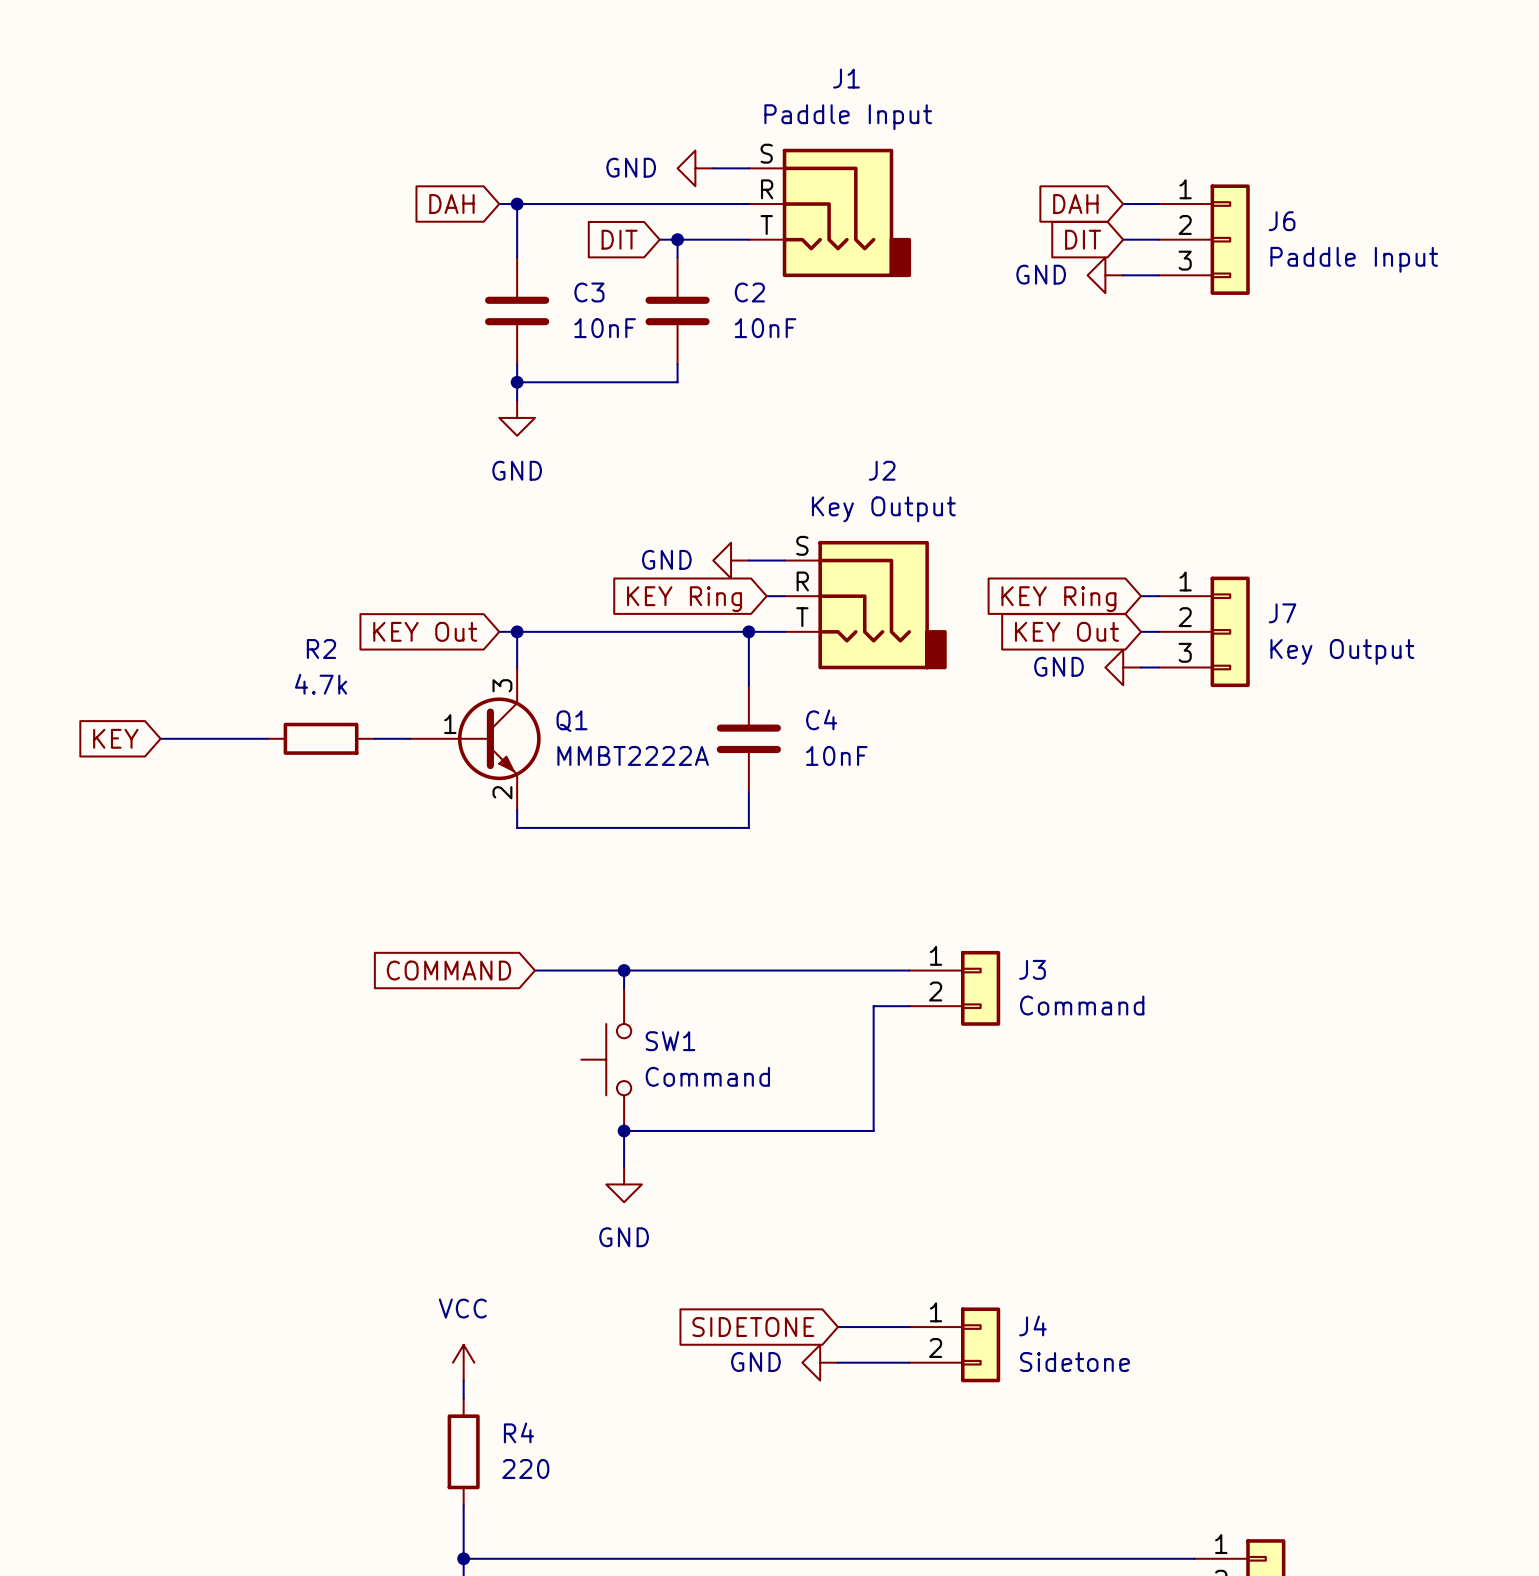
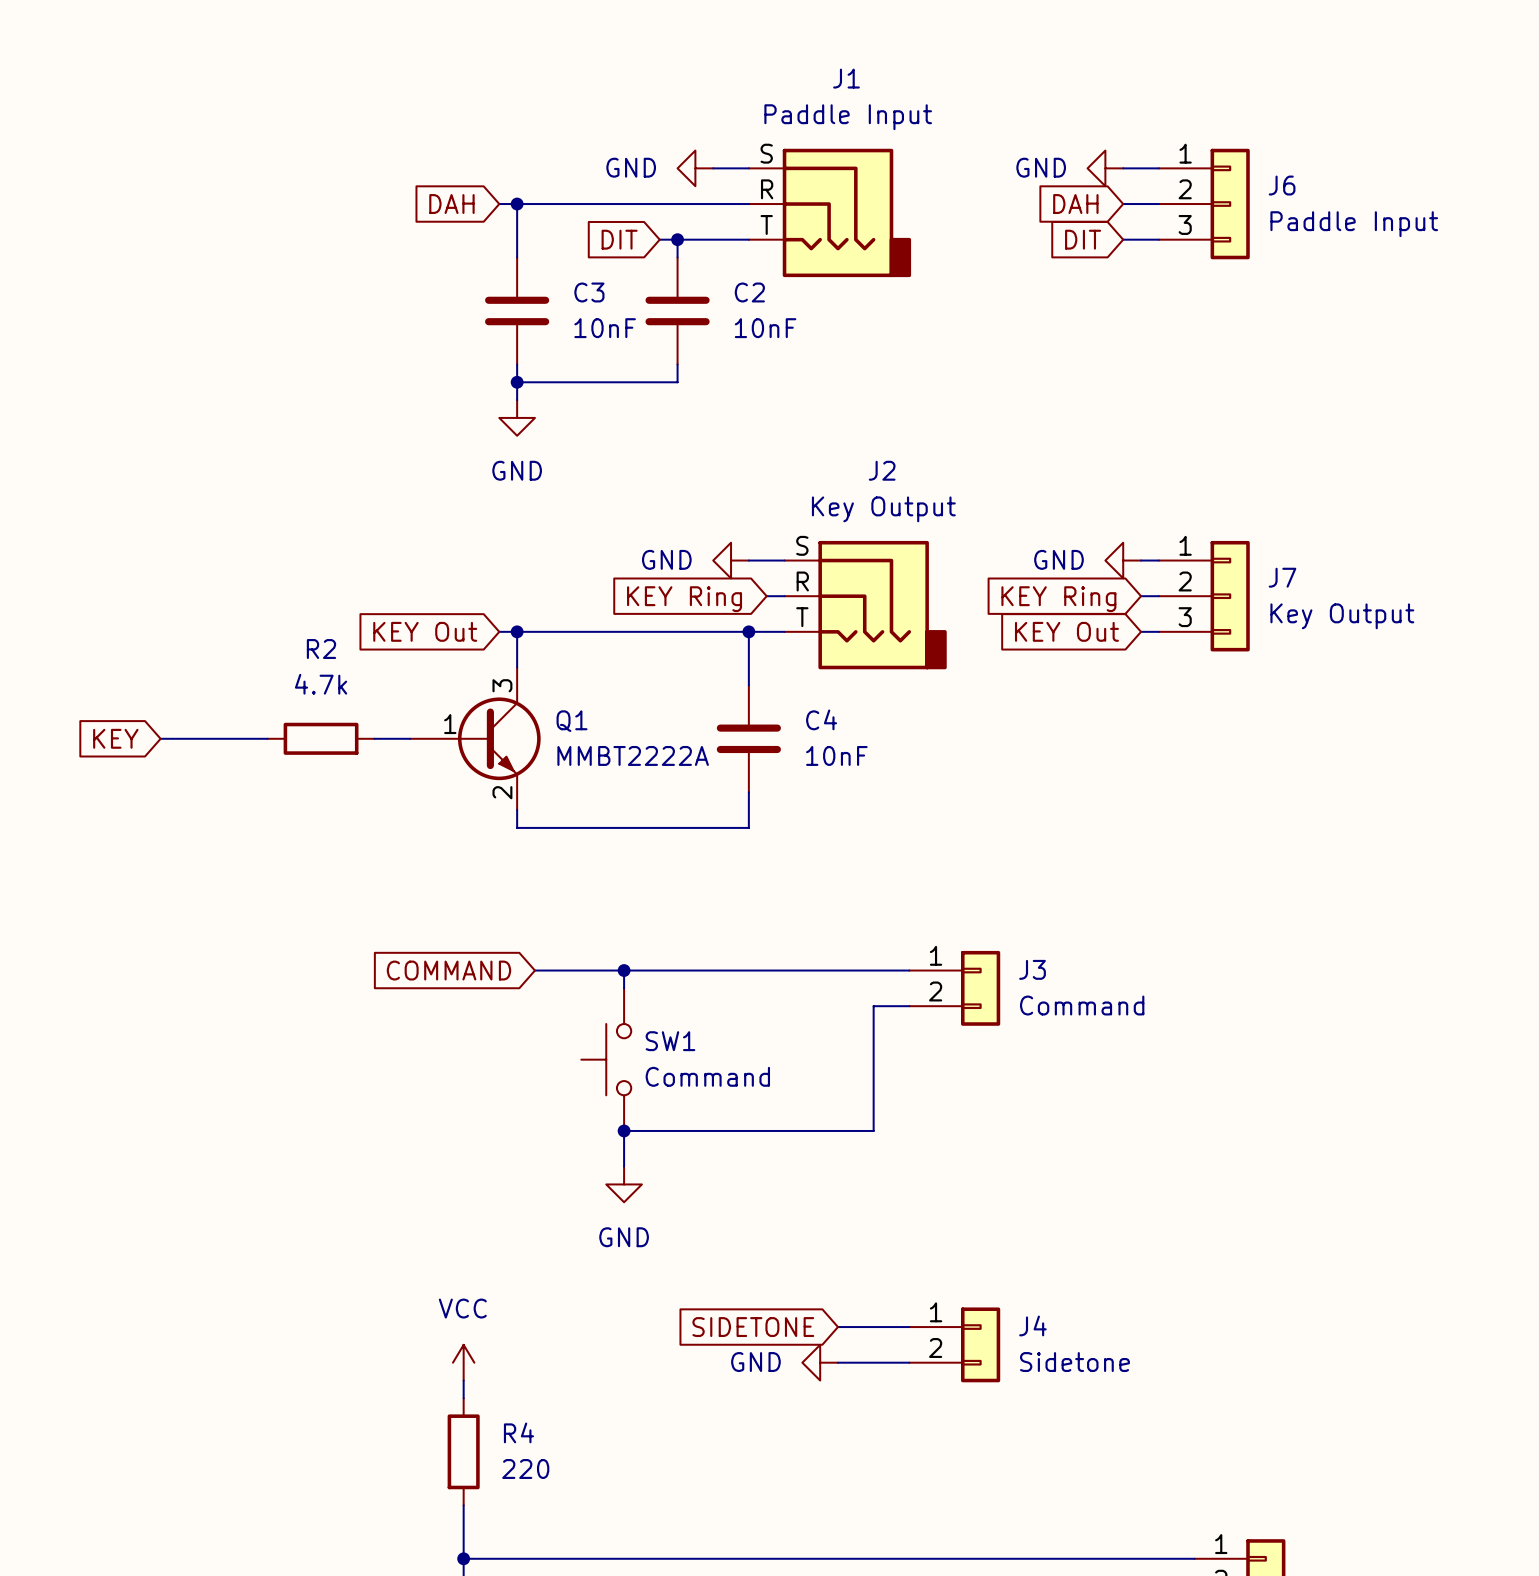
J6 position: (1204, 239) -> (1204, 204)
power symbol position: GND (1105, 275) -> GND (1105, 168)
wire: (1123, 275) (1158, 275) -> (1123, 168) (1158, 168)
J7 position: (1204, 631) -> (1204, 596)
power symbol position: GND (1123, 667) -> GND (1123, 560)
wire: (1141, 667) (1158, 667) -> (1141, 560) (1158, 560)

